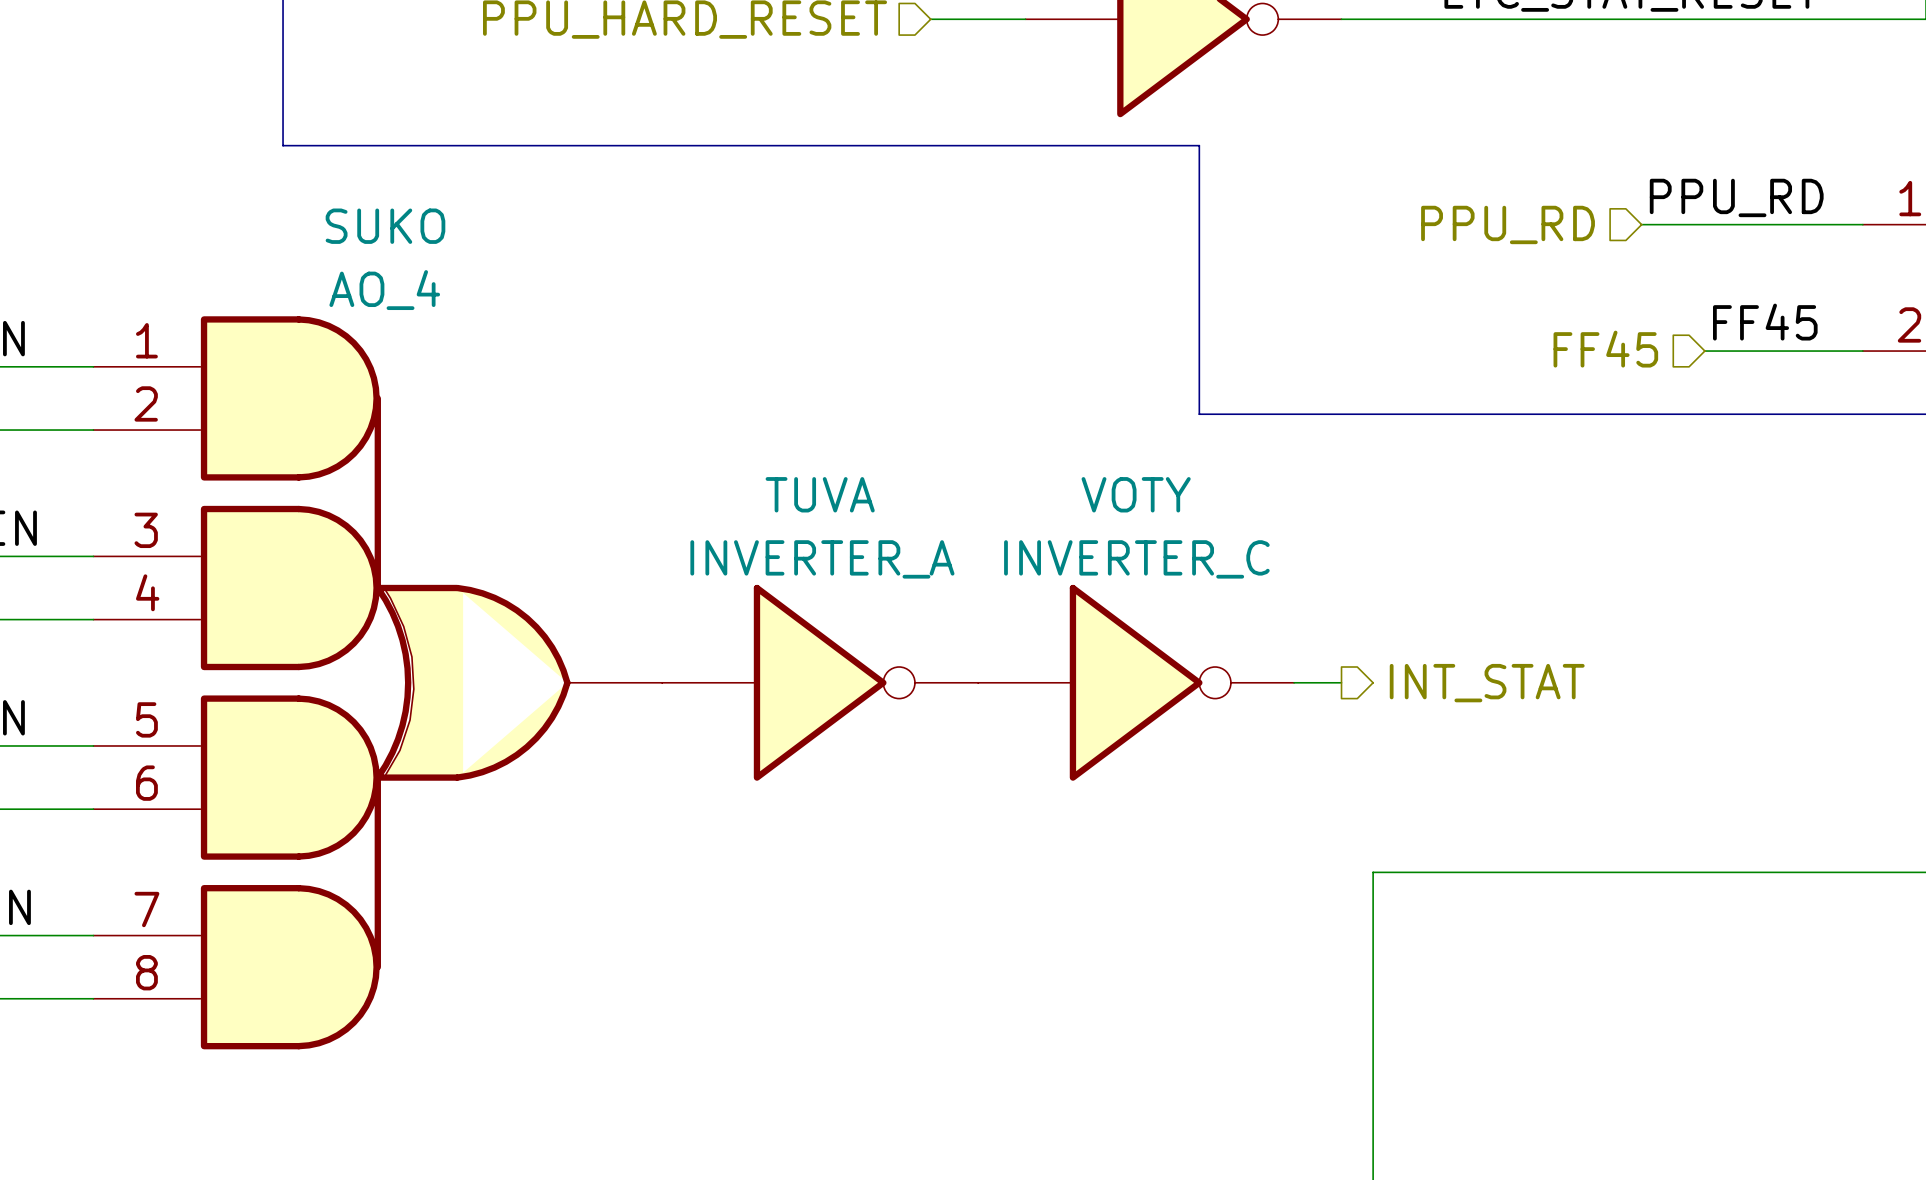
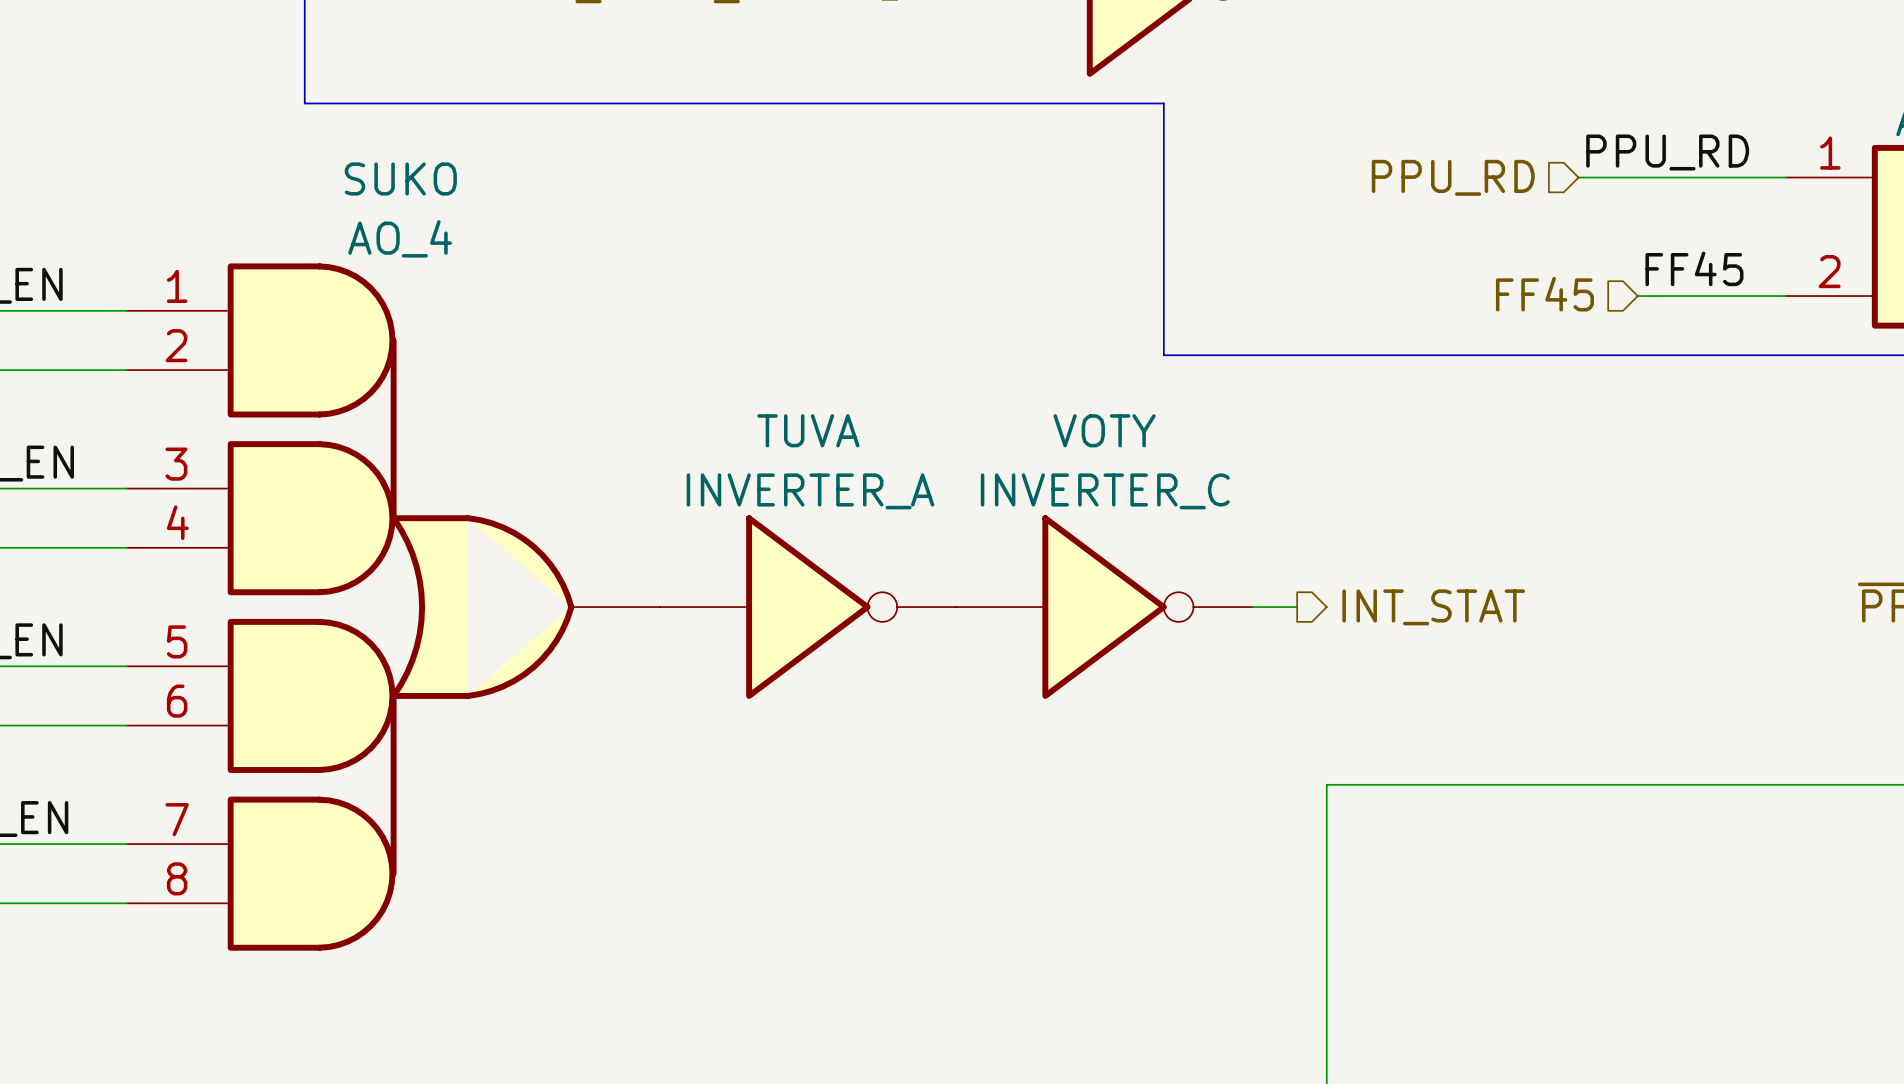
SUKO symbol: [93, 316, 663, 1050] -> [126, 263, 661, 951]

